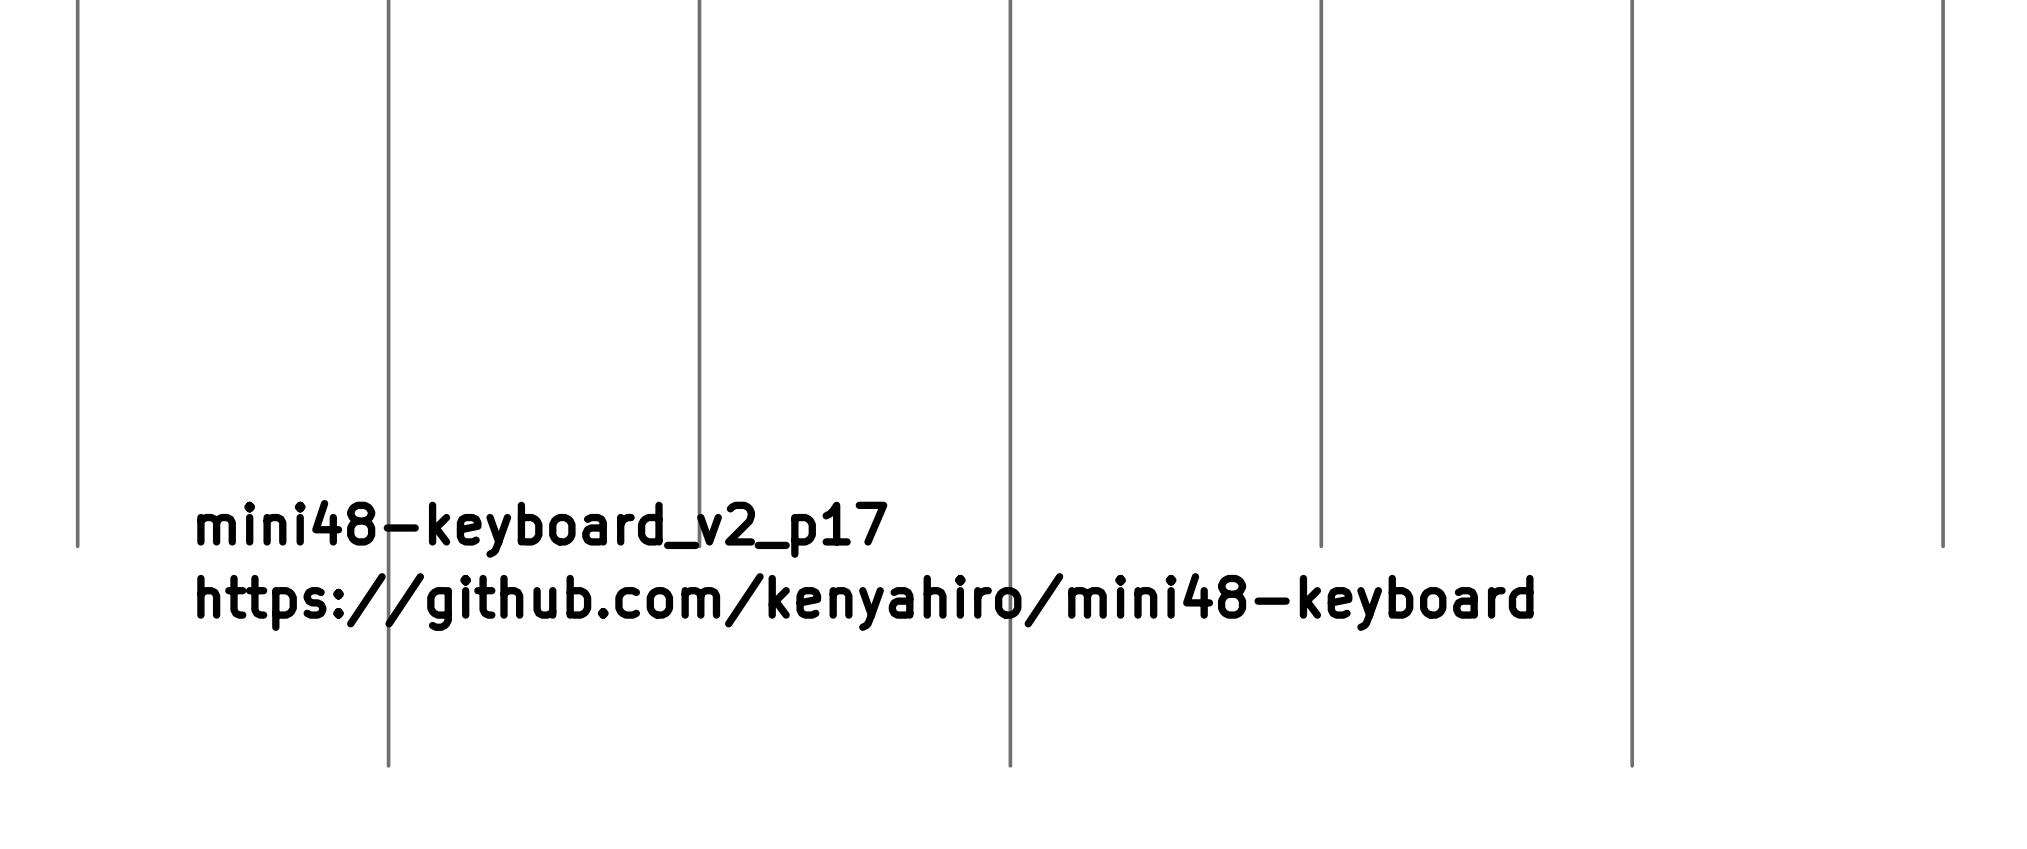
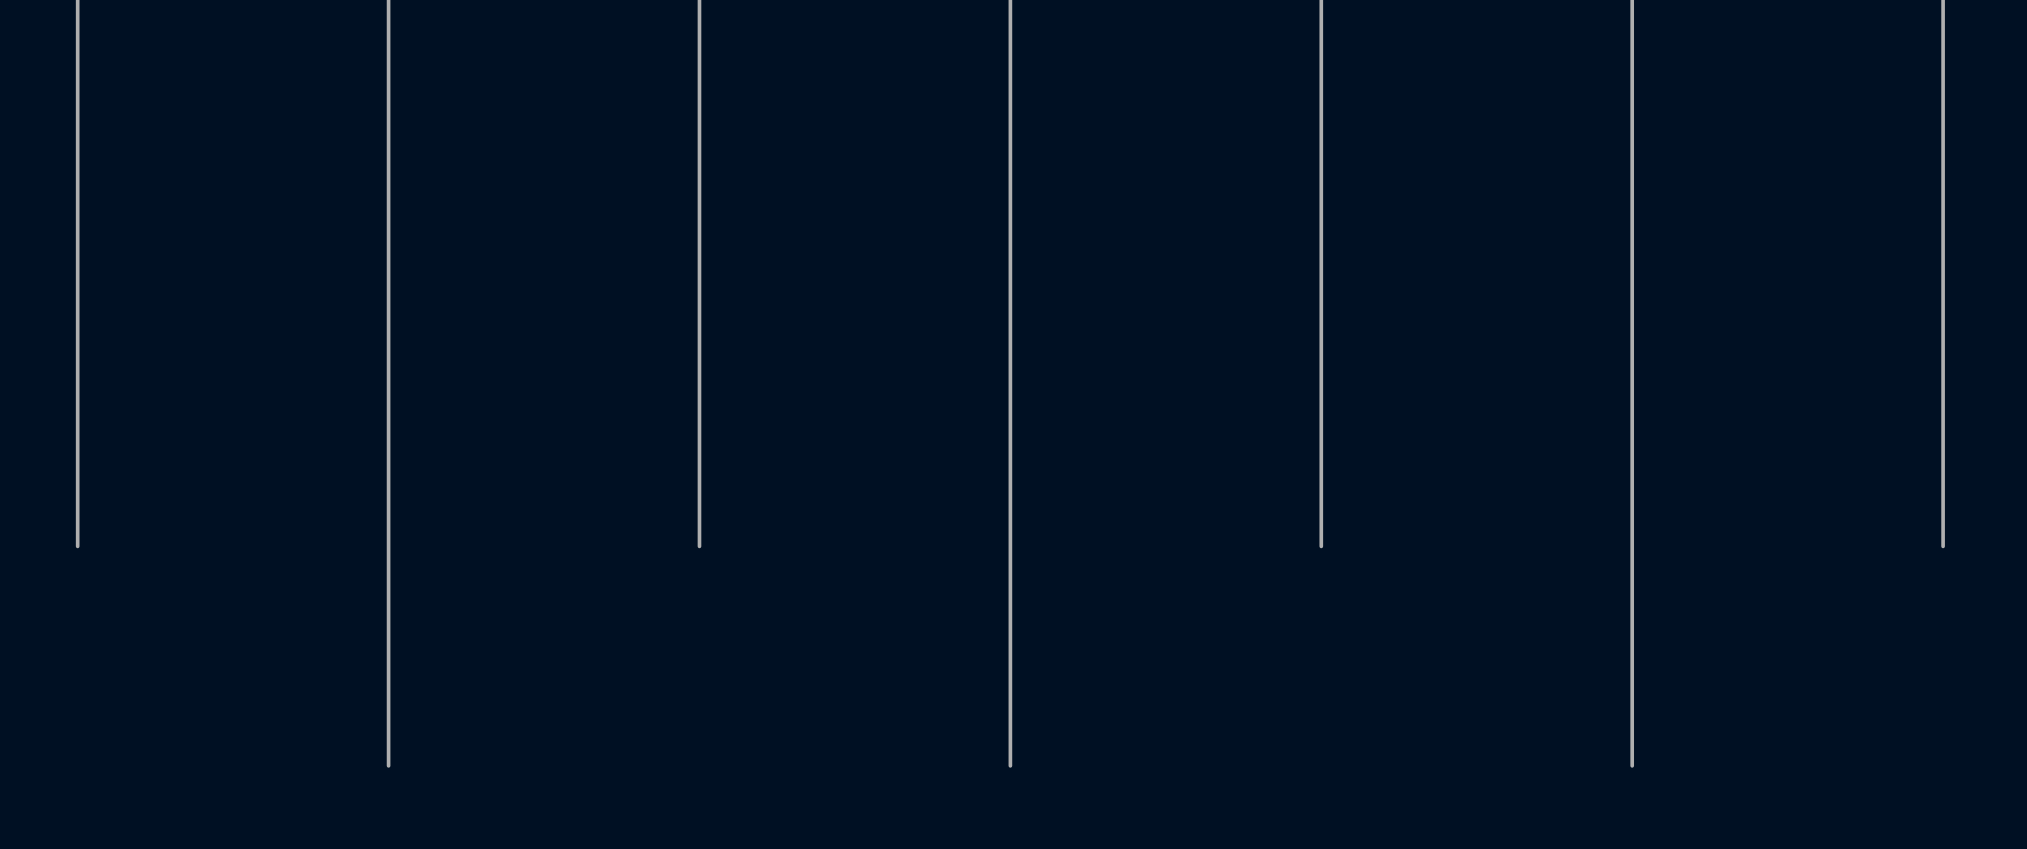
text: mini48-keyboard_v2_p17 (542, 528) -> none
text: https://github.com/kenyahiro/mini48-keyboard (865, 602) -> none

